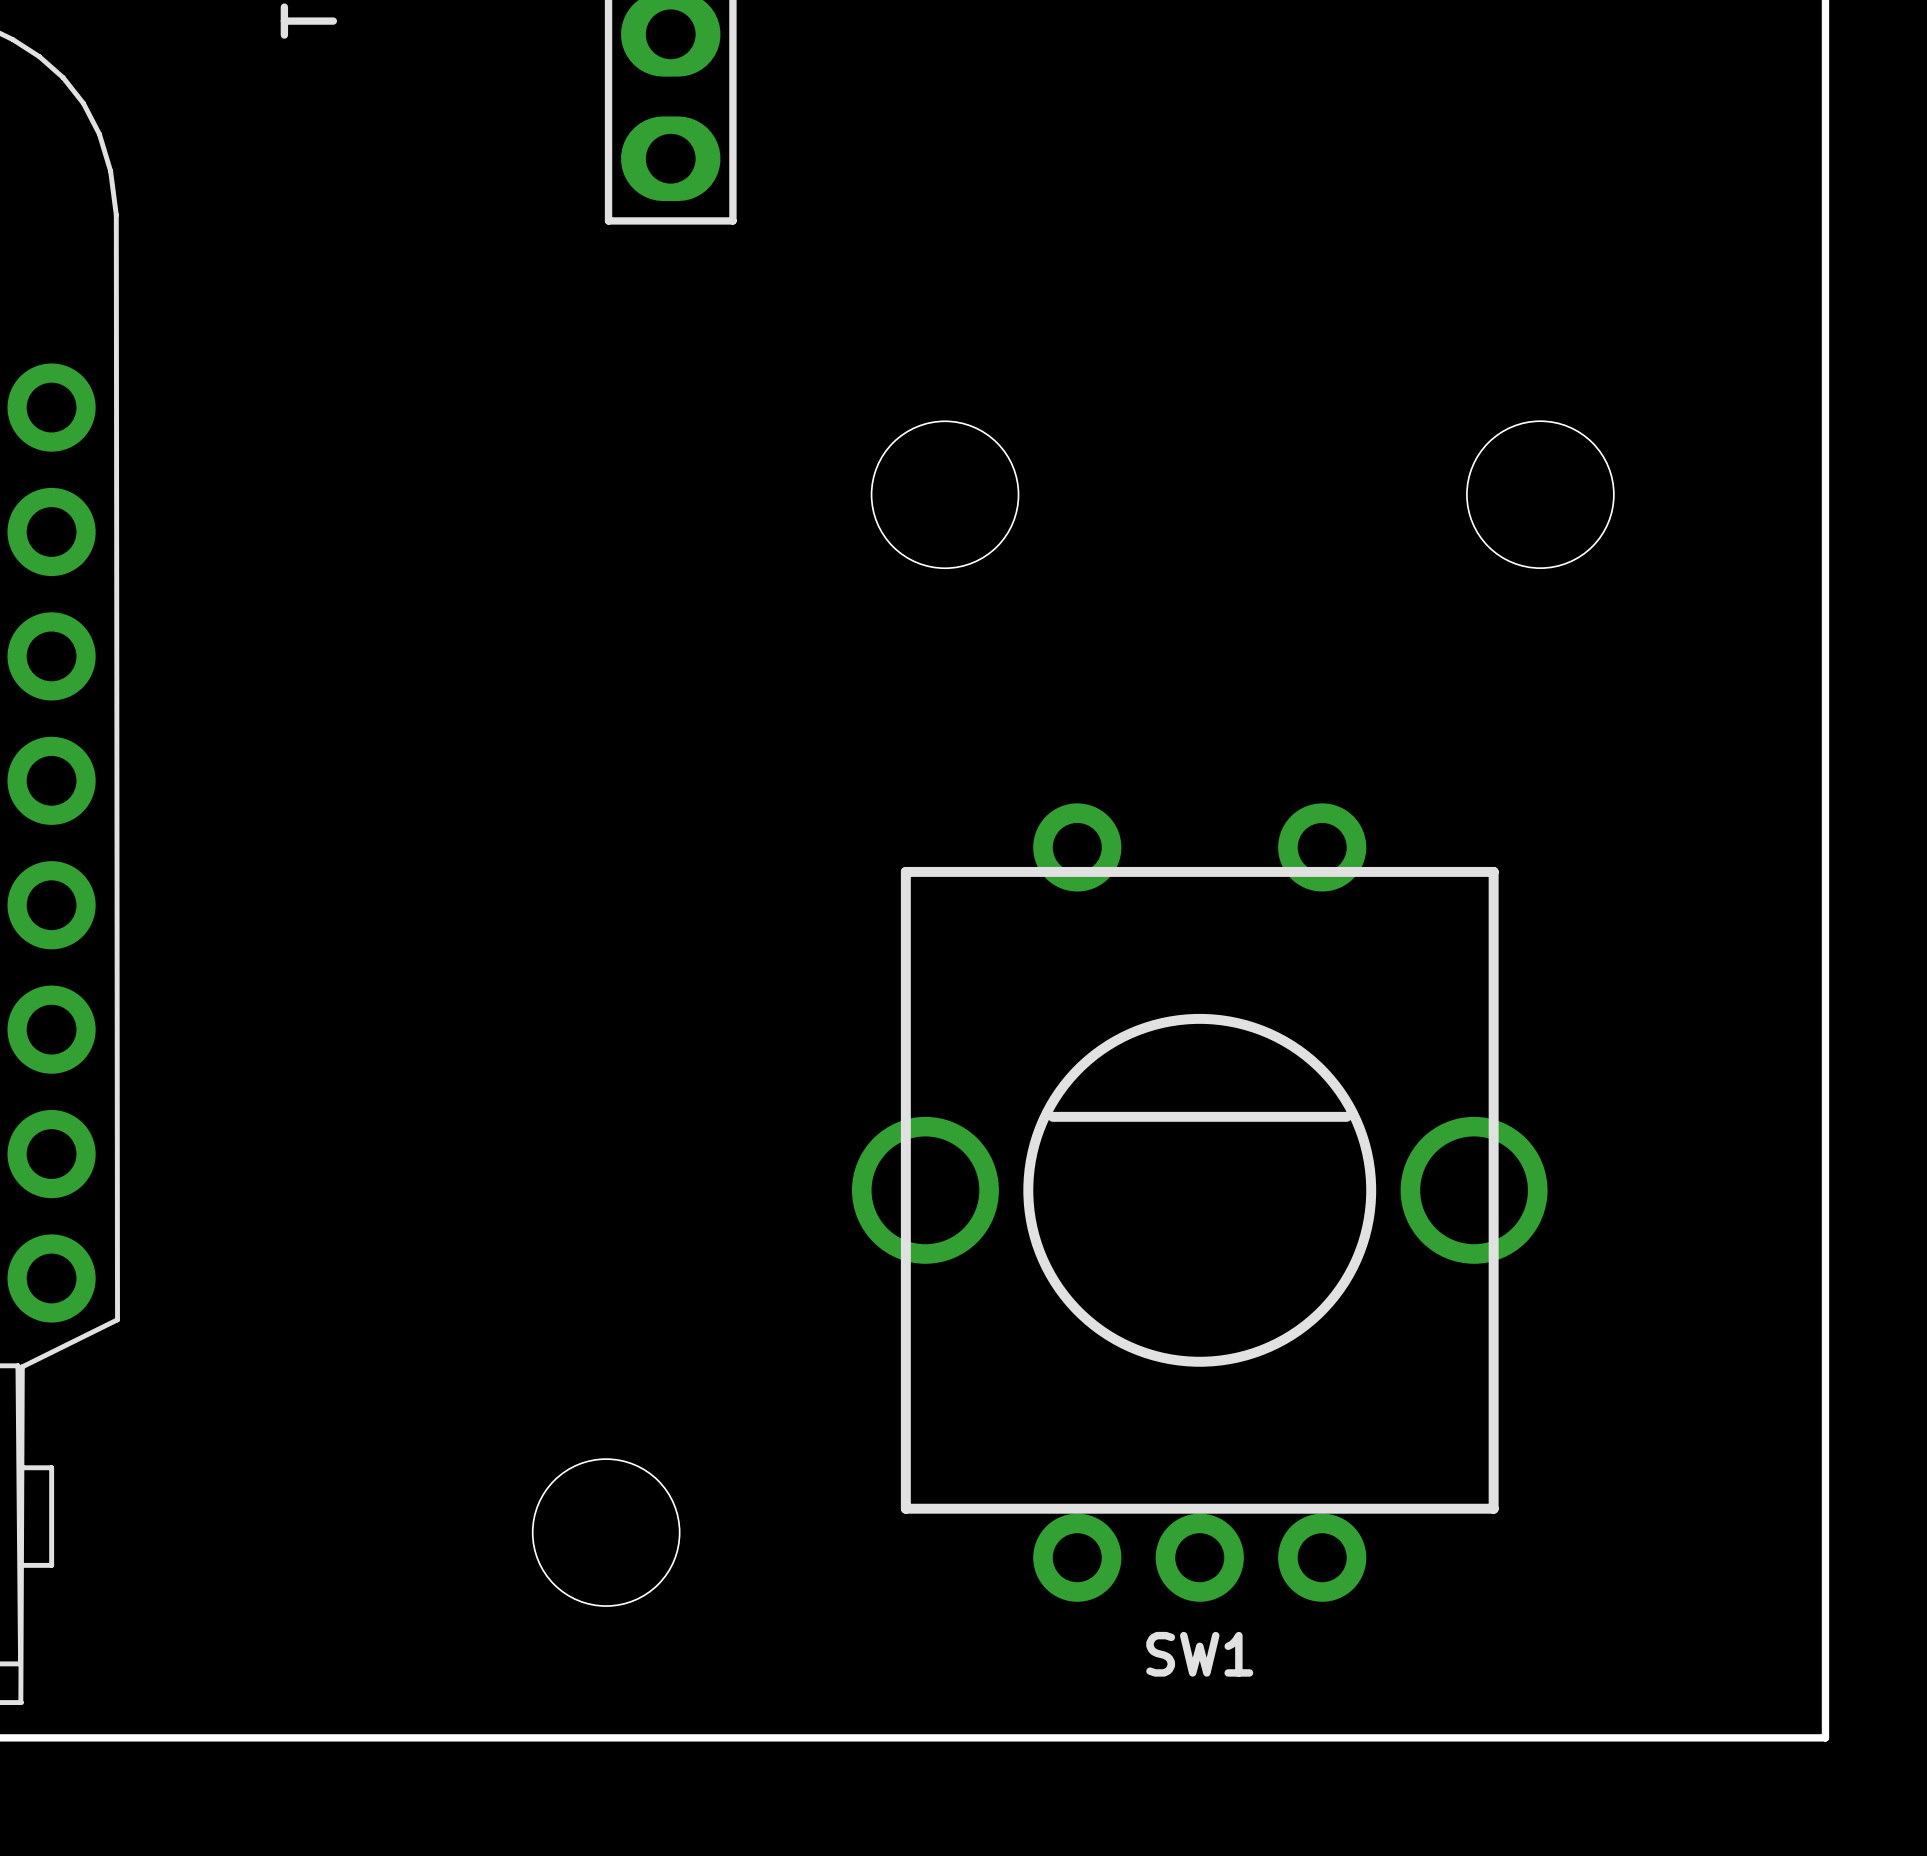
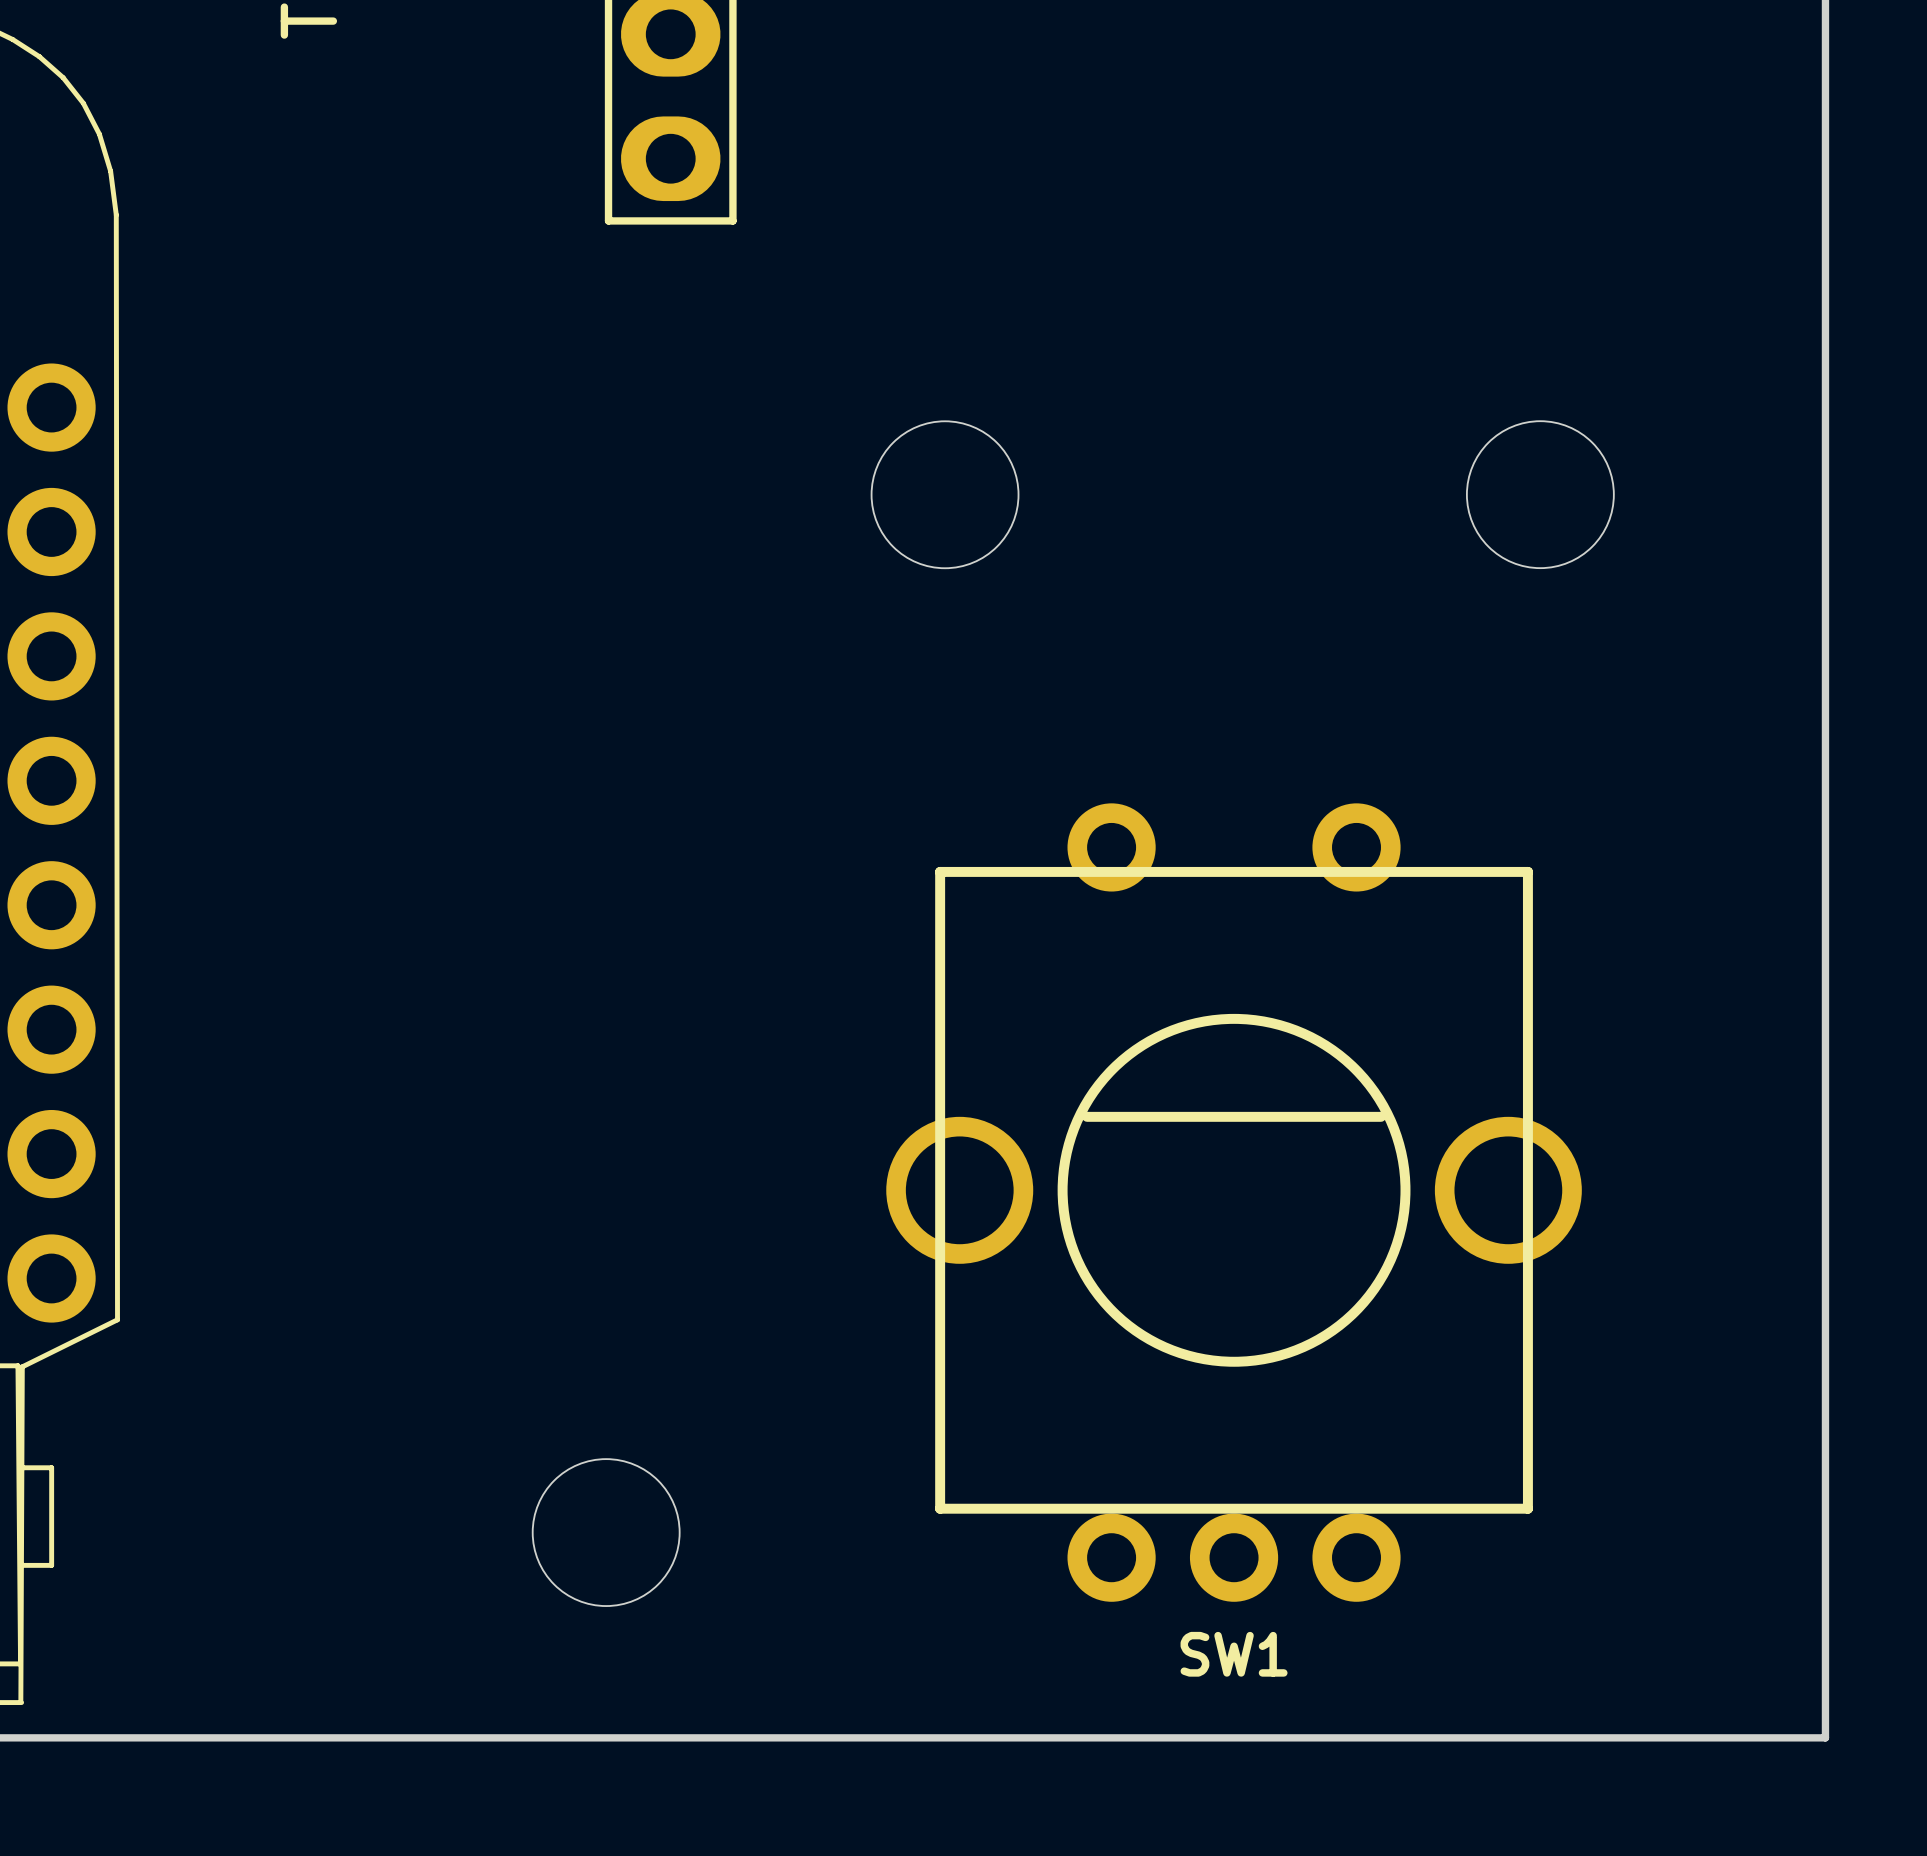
SW1 position: (1199, 1202) -> (1234, 1202)

